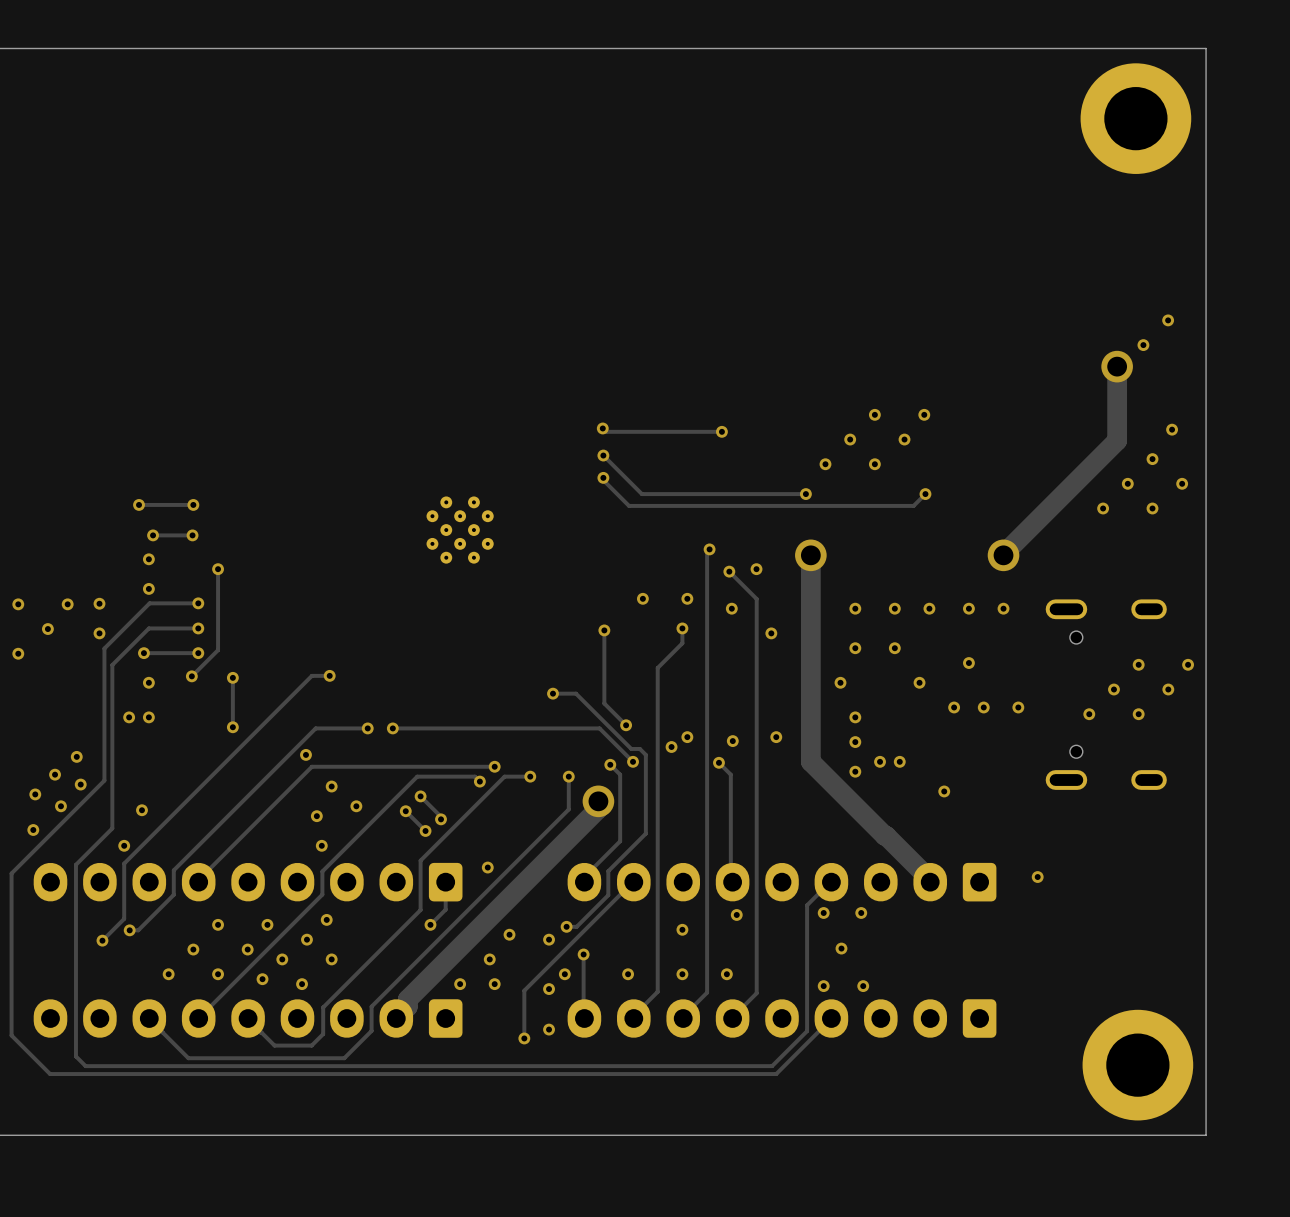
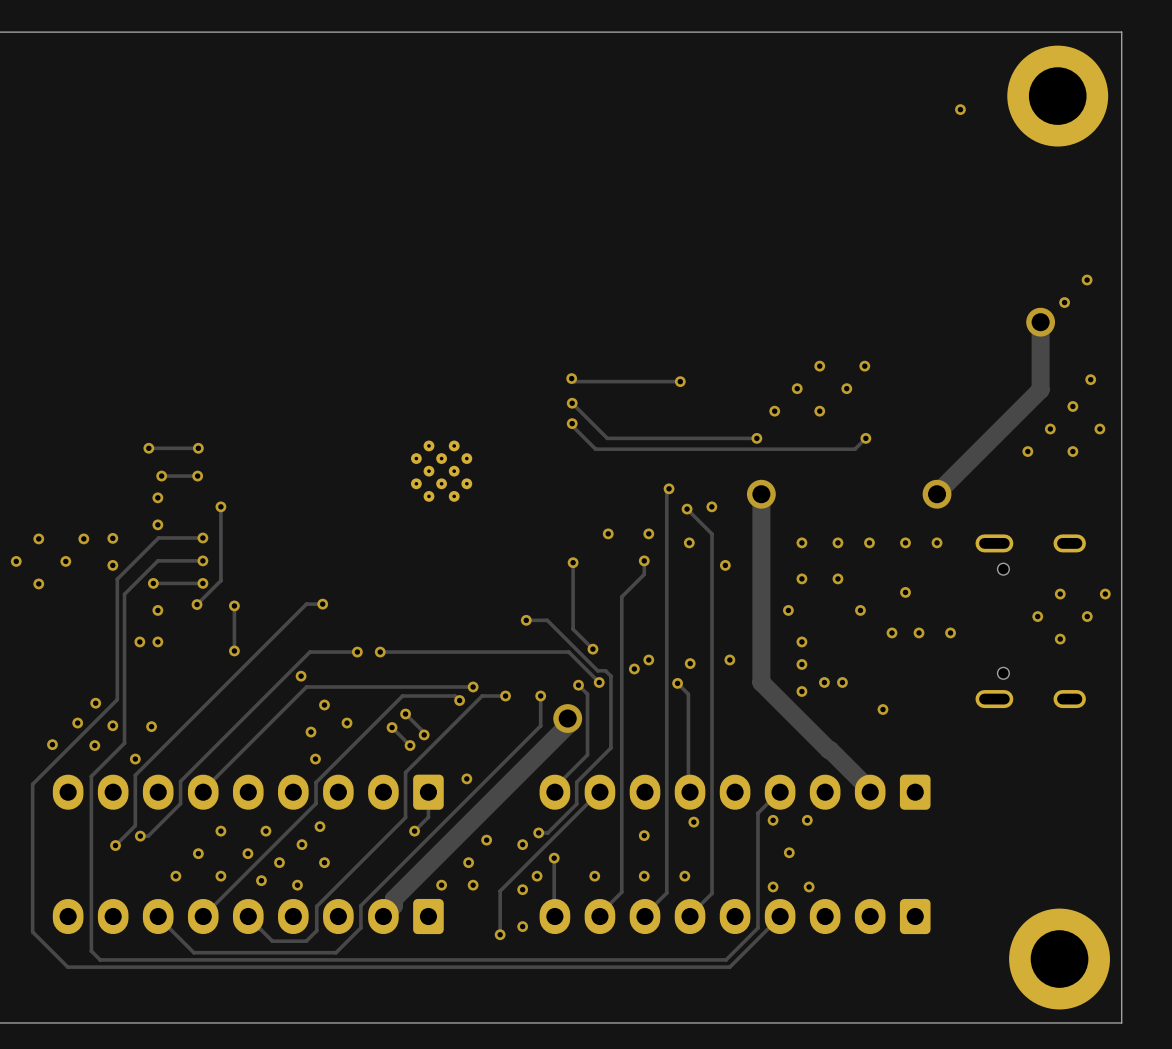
via: none -> (960, 109)
via: (1089, 714) -> none
via: (76, 756) -> none
via: (55, 774) -> none
via: (35, 794) -> none
via: none -> (112, 725)
via: none -> (94, 745)
via: (1037, 877) -> none

